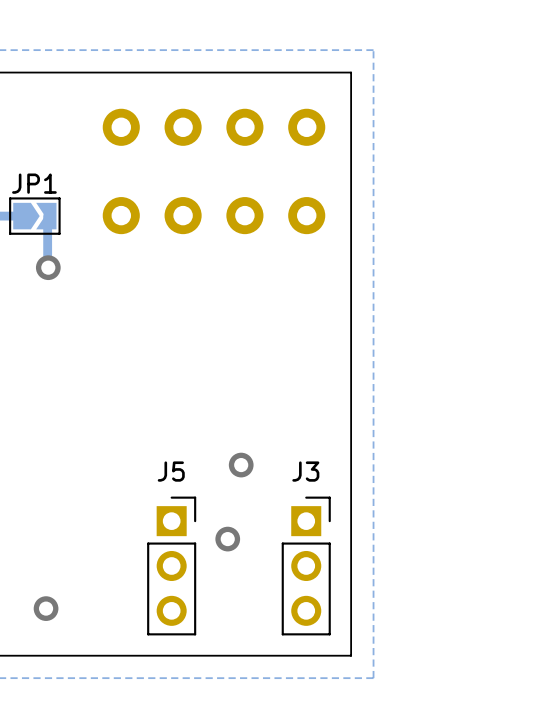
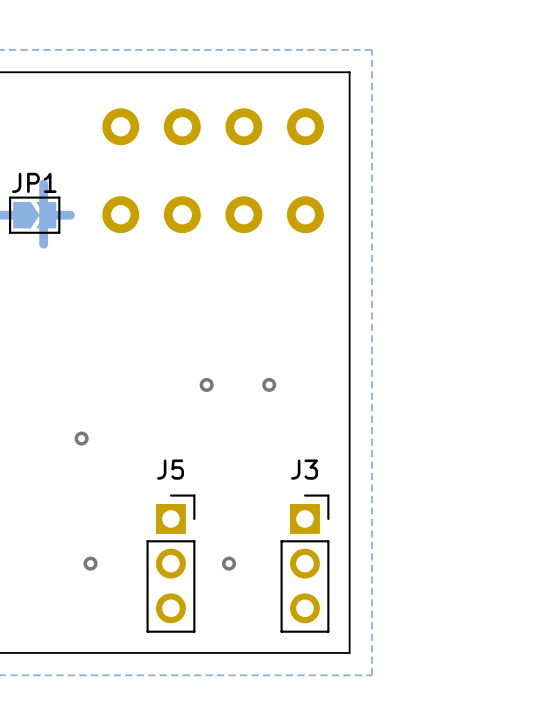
track: none -> (43, 183) (43, 244)
track: (47, 216) (48, 267) -> none
track: none -> (70, 215) (43, 215)
via: (48, 267) -> none
via: none -> (206, 384)
via: none -> (269, 384)
via: none -> (81, 438)
via: (241, 465) -> none
via: (227, 539) -> none
via: none -> (90, 563)
via: none -> (229, 563)
via: (46, 608) -> none

